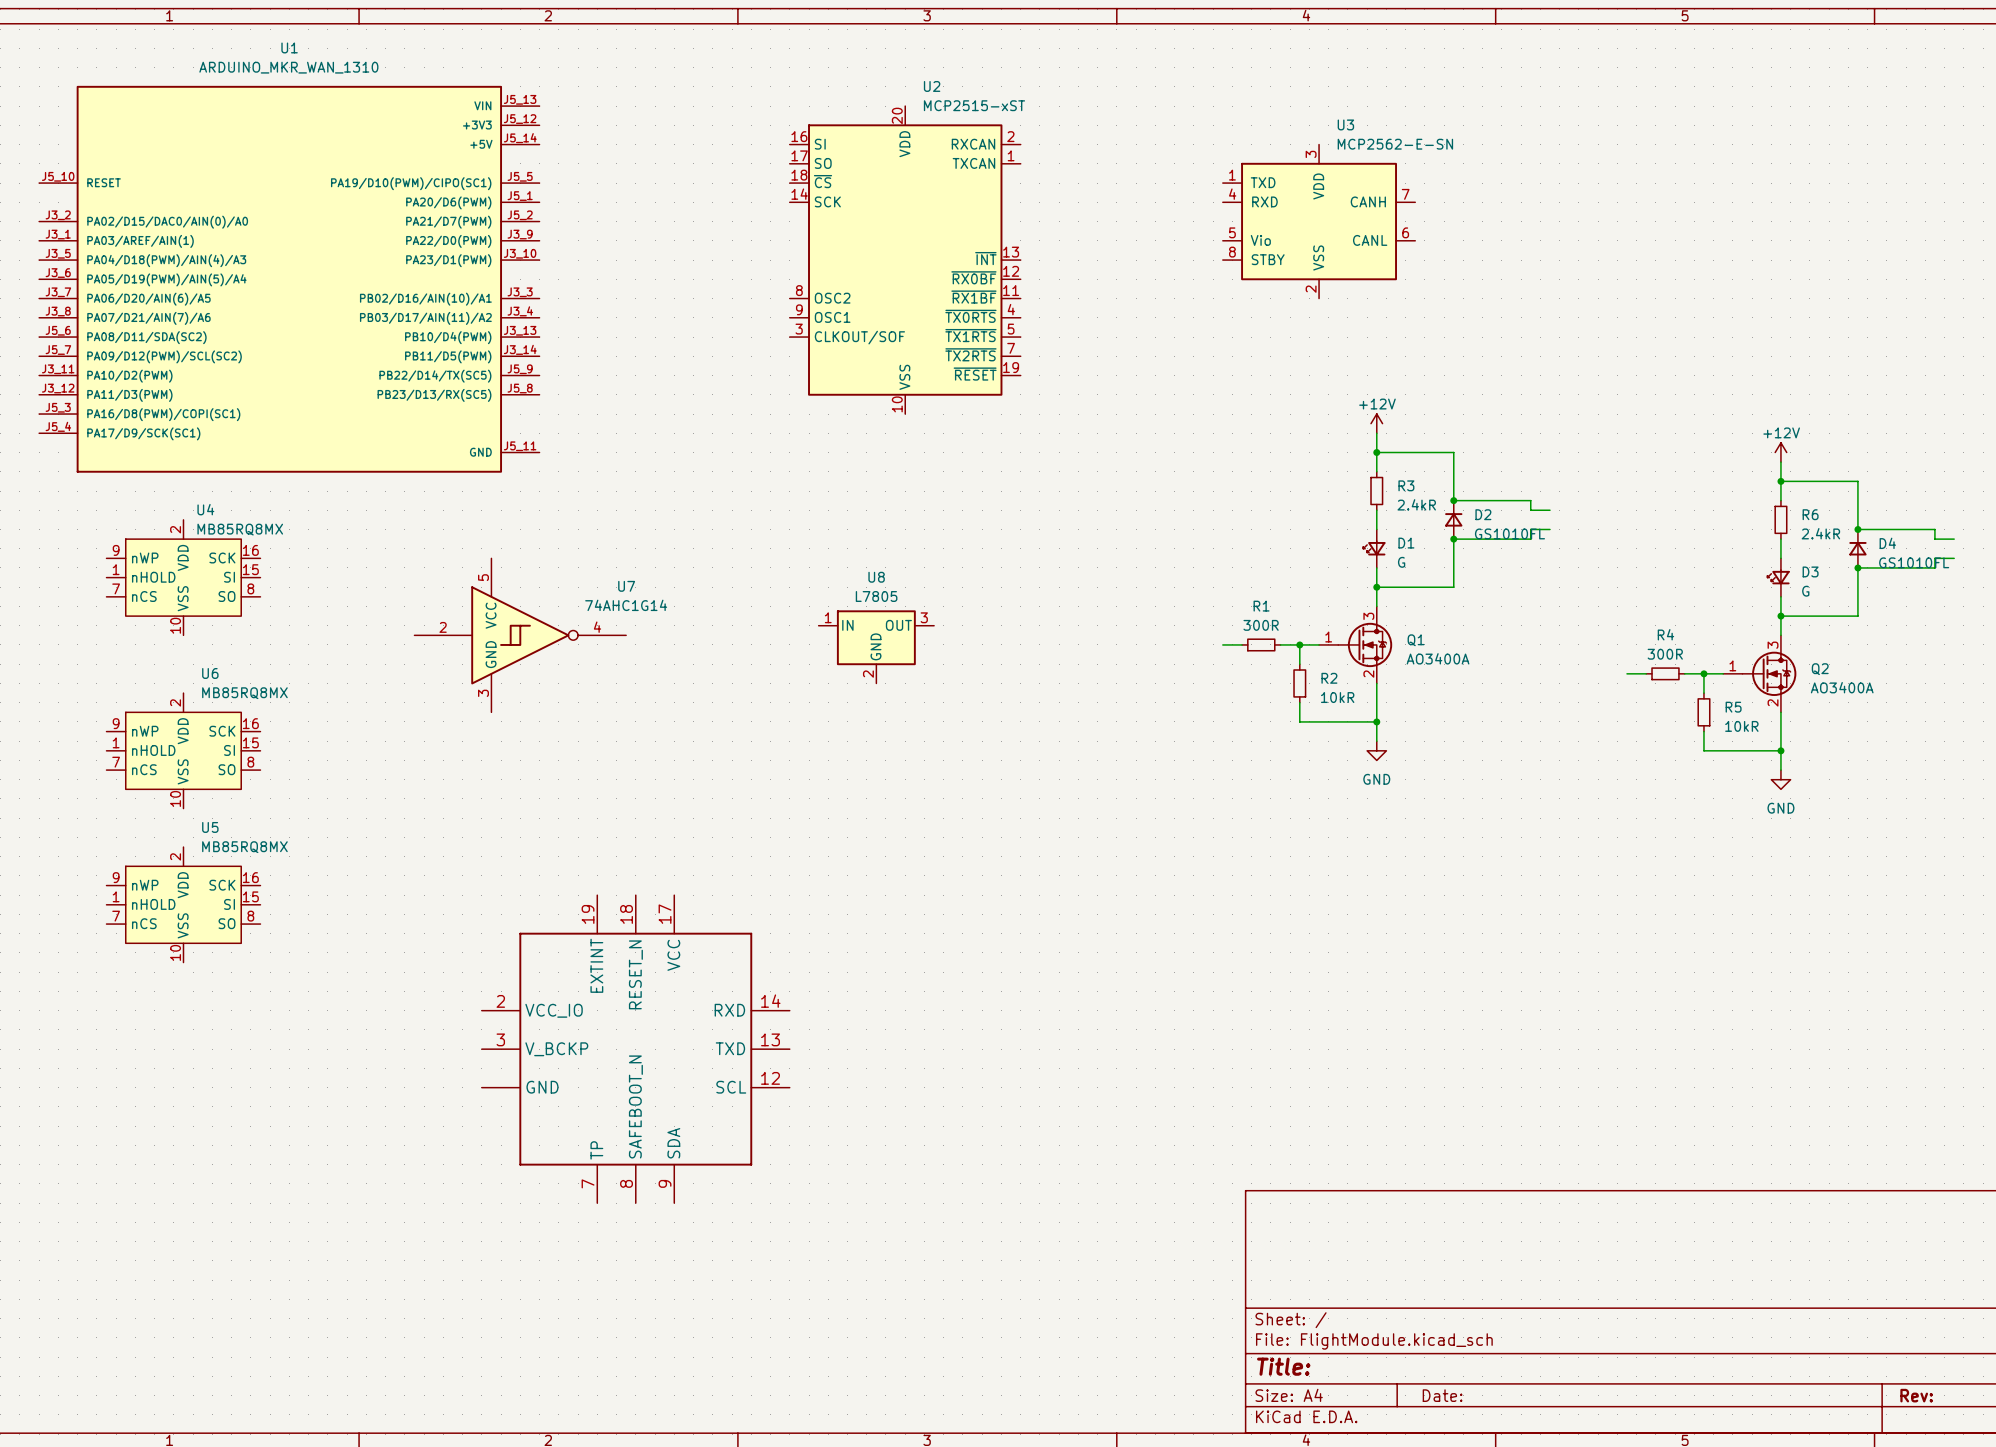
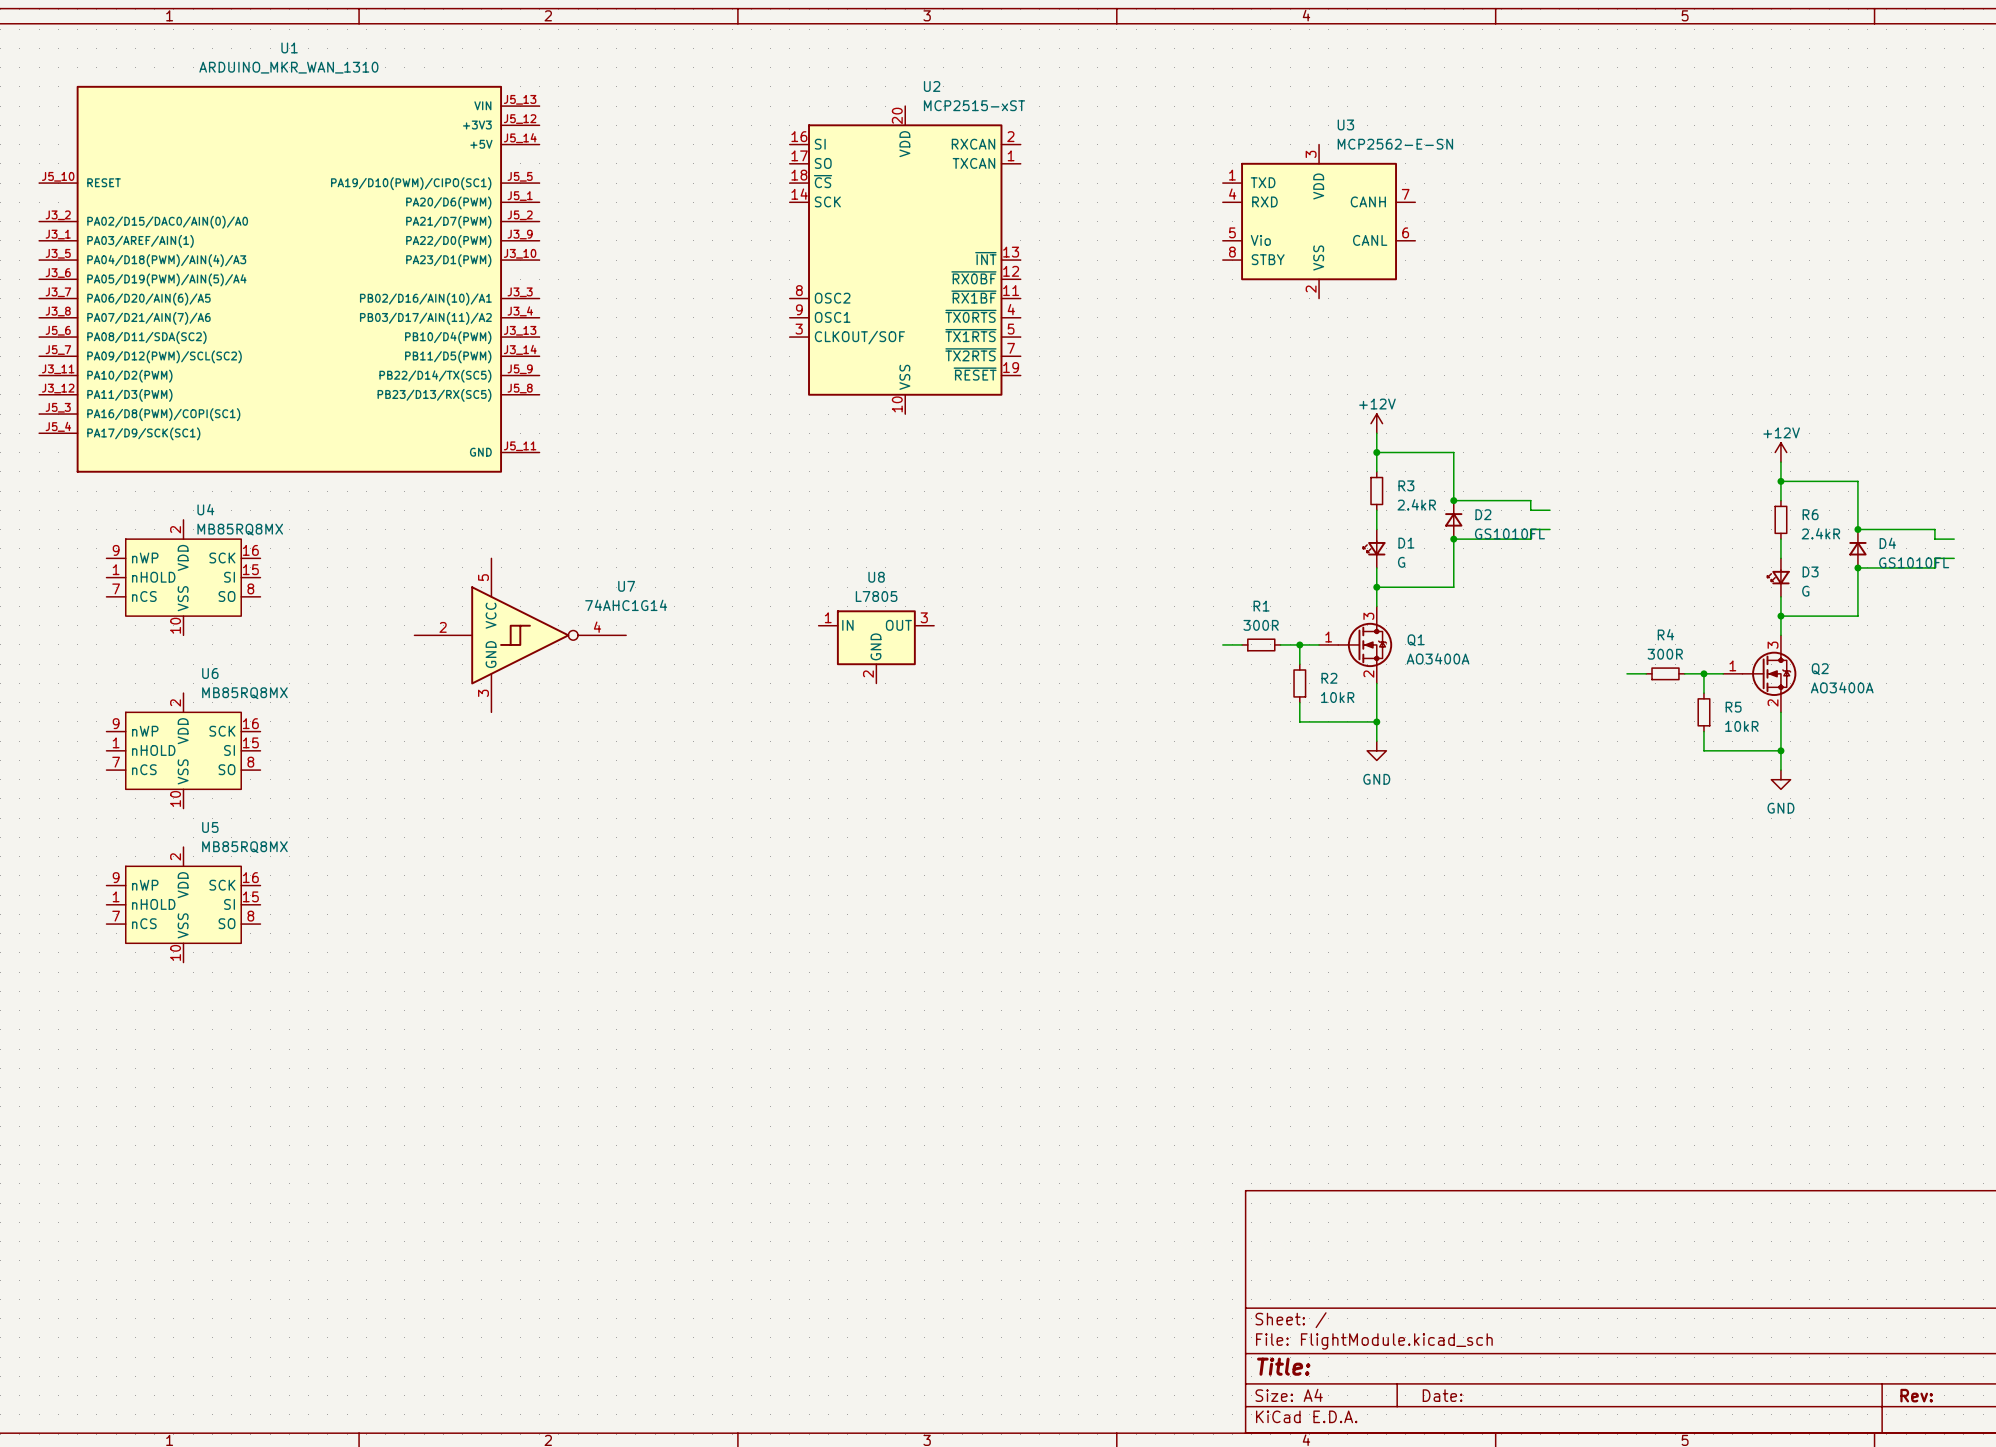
part: (635, 1049) -> none

